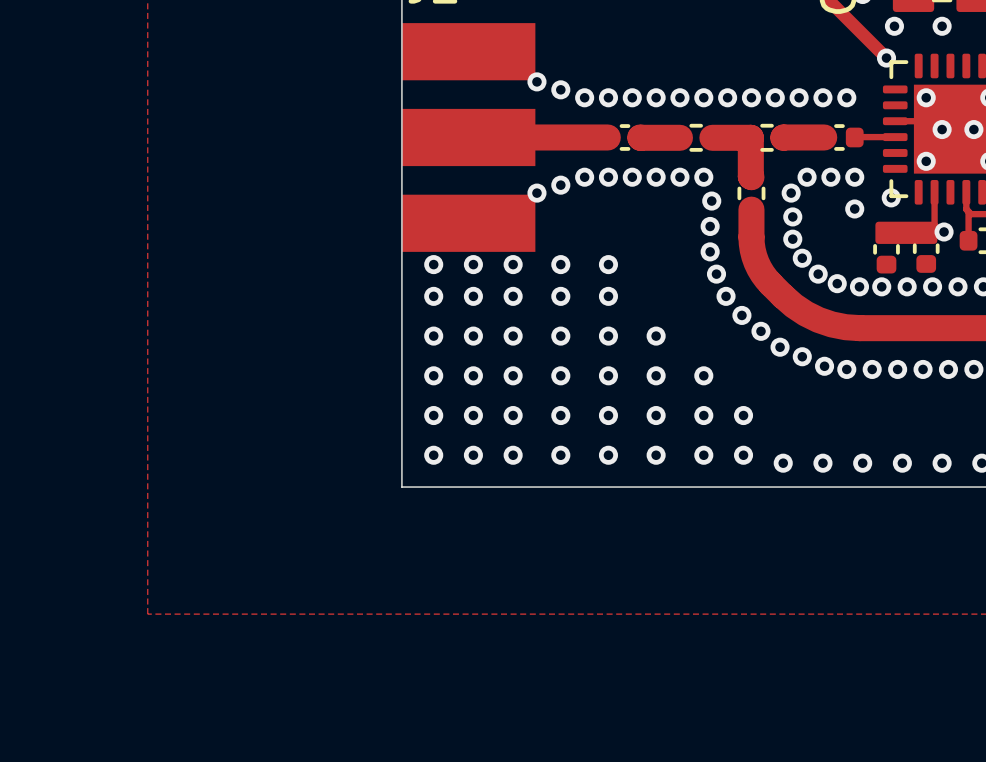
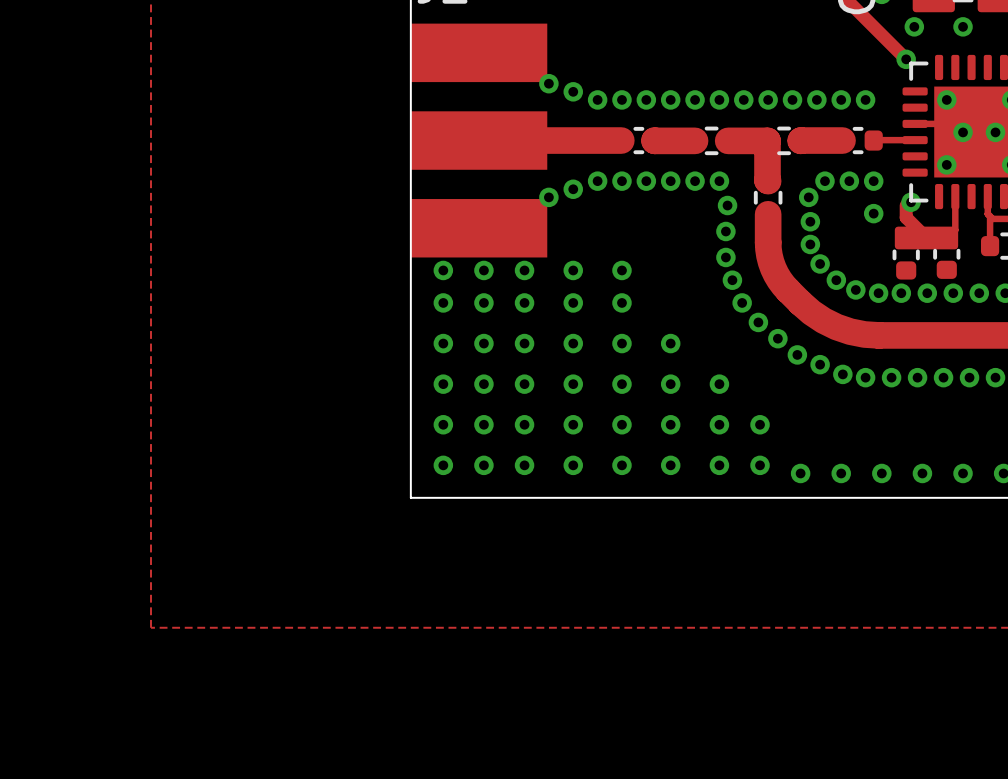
track: none -> (906, 205) (906, 217) (926, 237)
via: (944, 231) -> none

